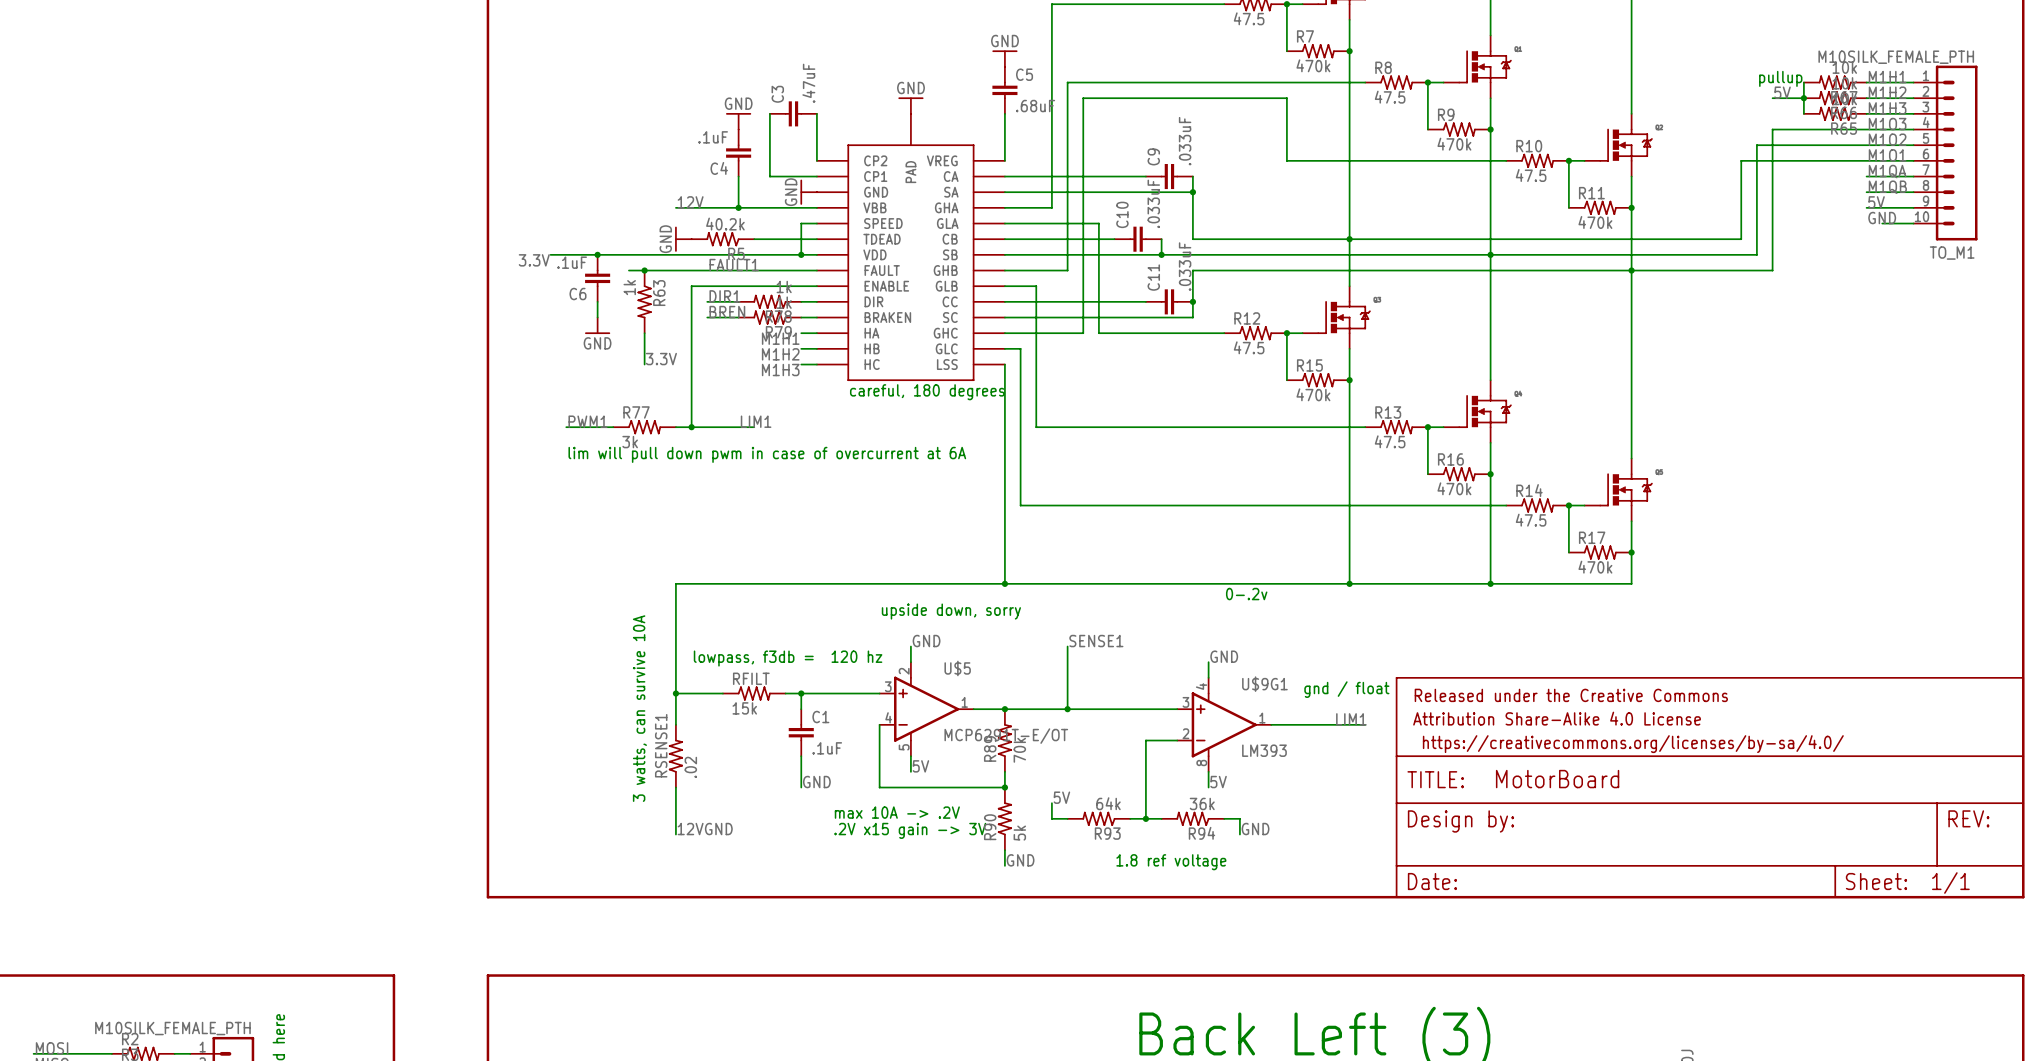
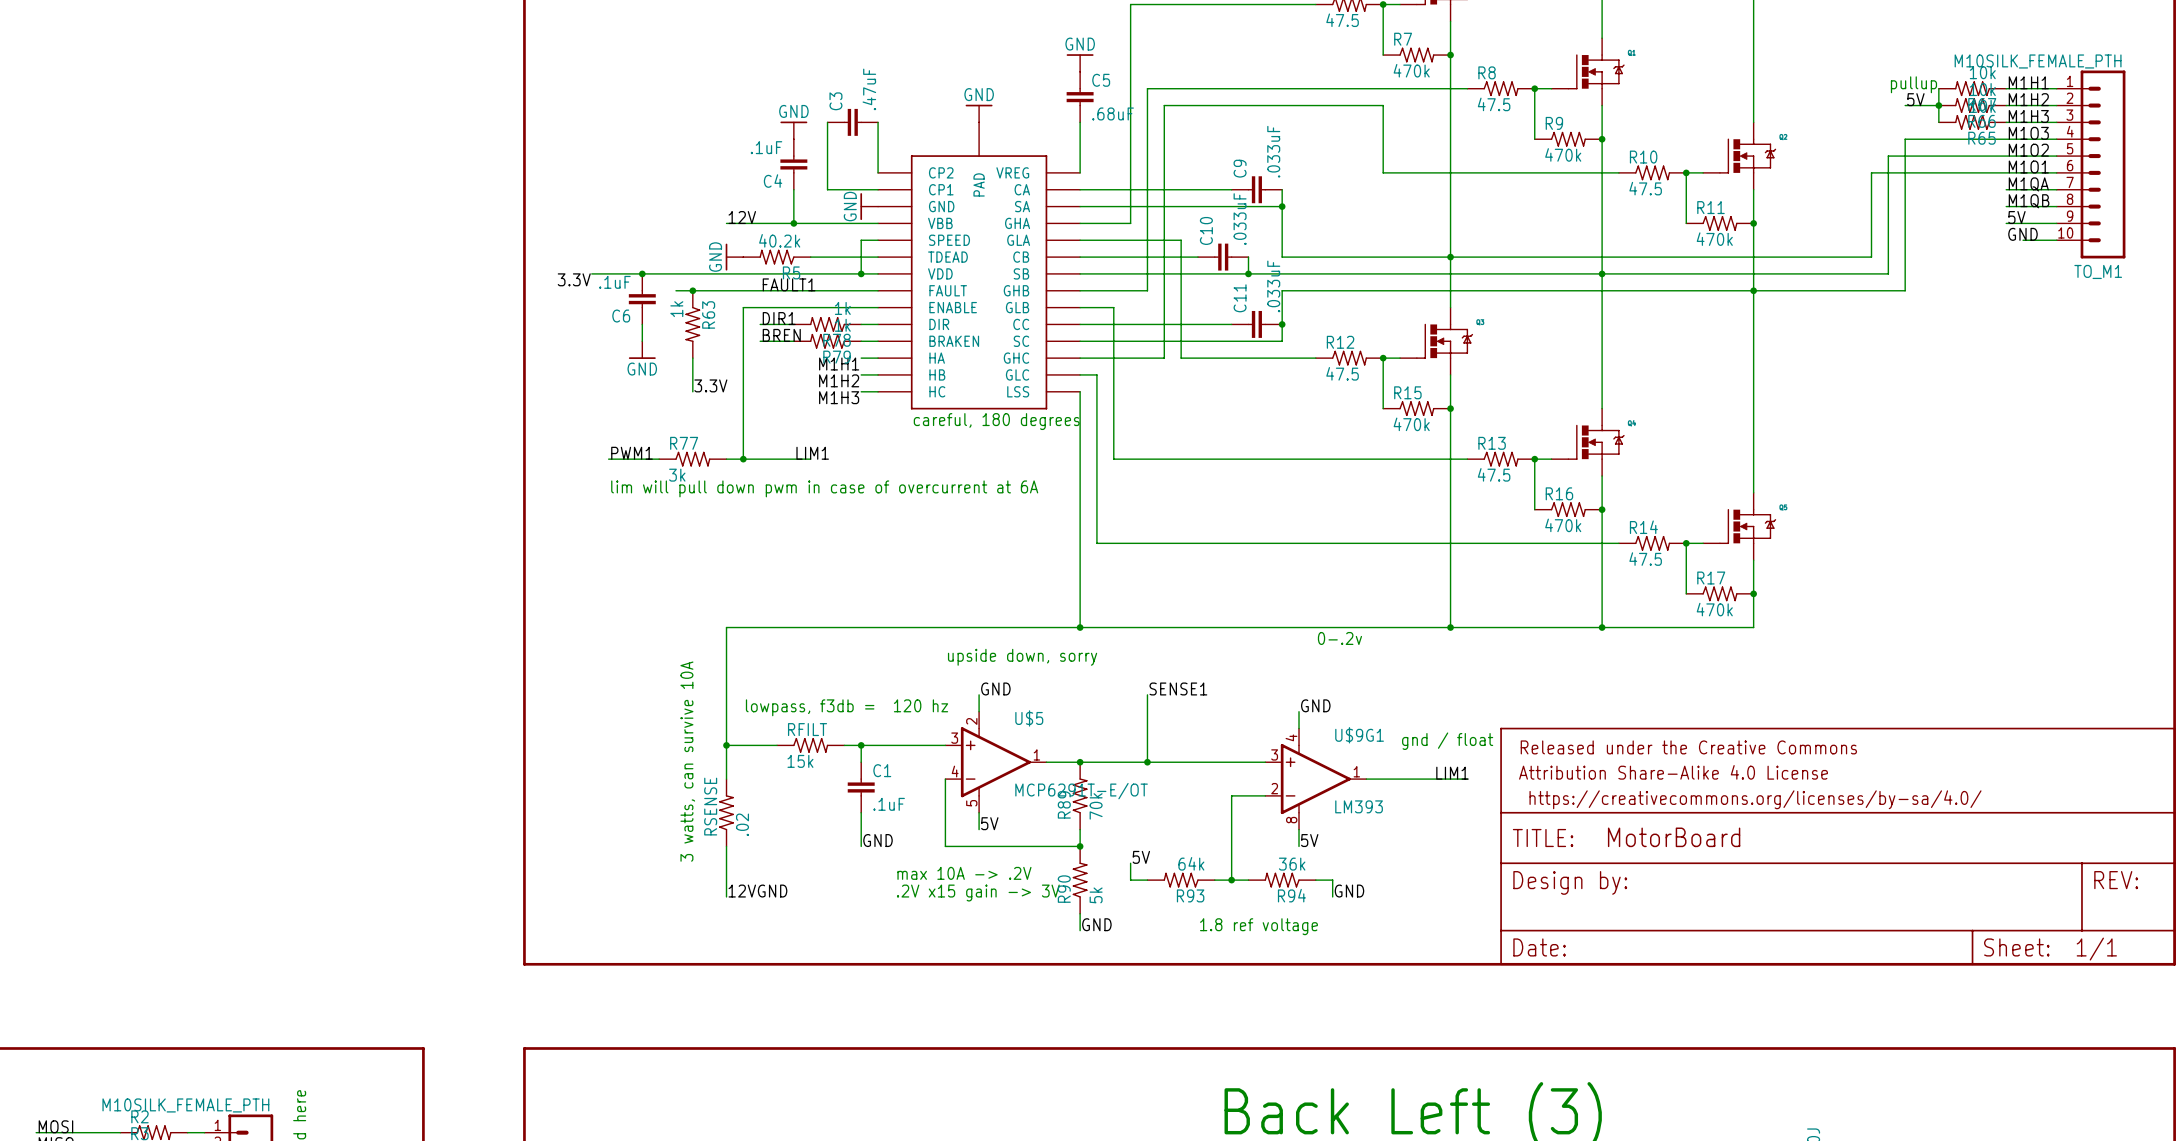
RSENSE1 name: RSENSE1 (661, 745) -> RSENSE (710, 806)

